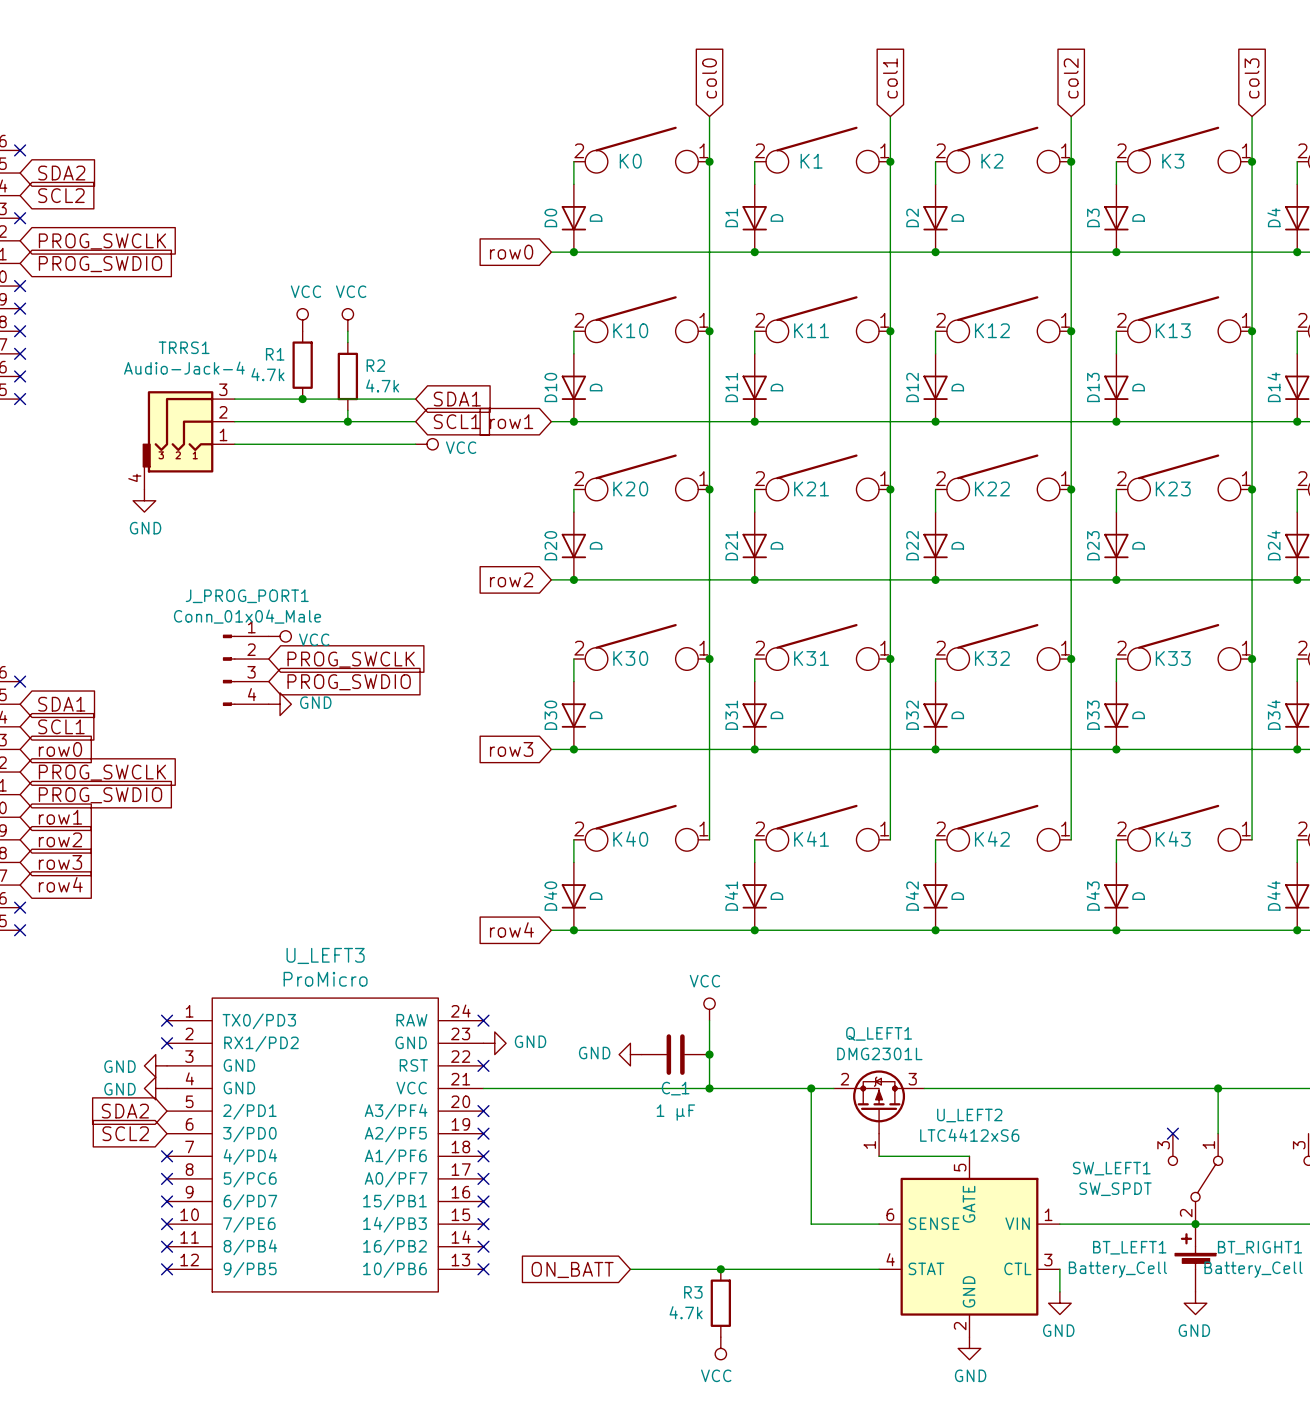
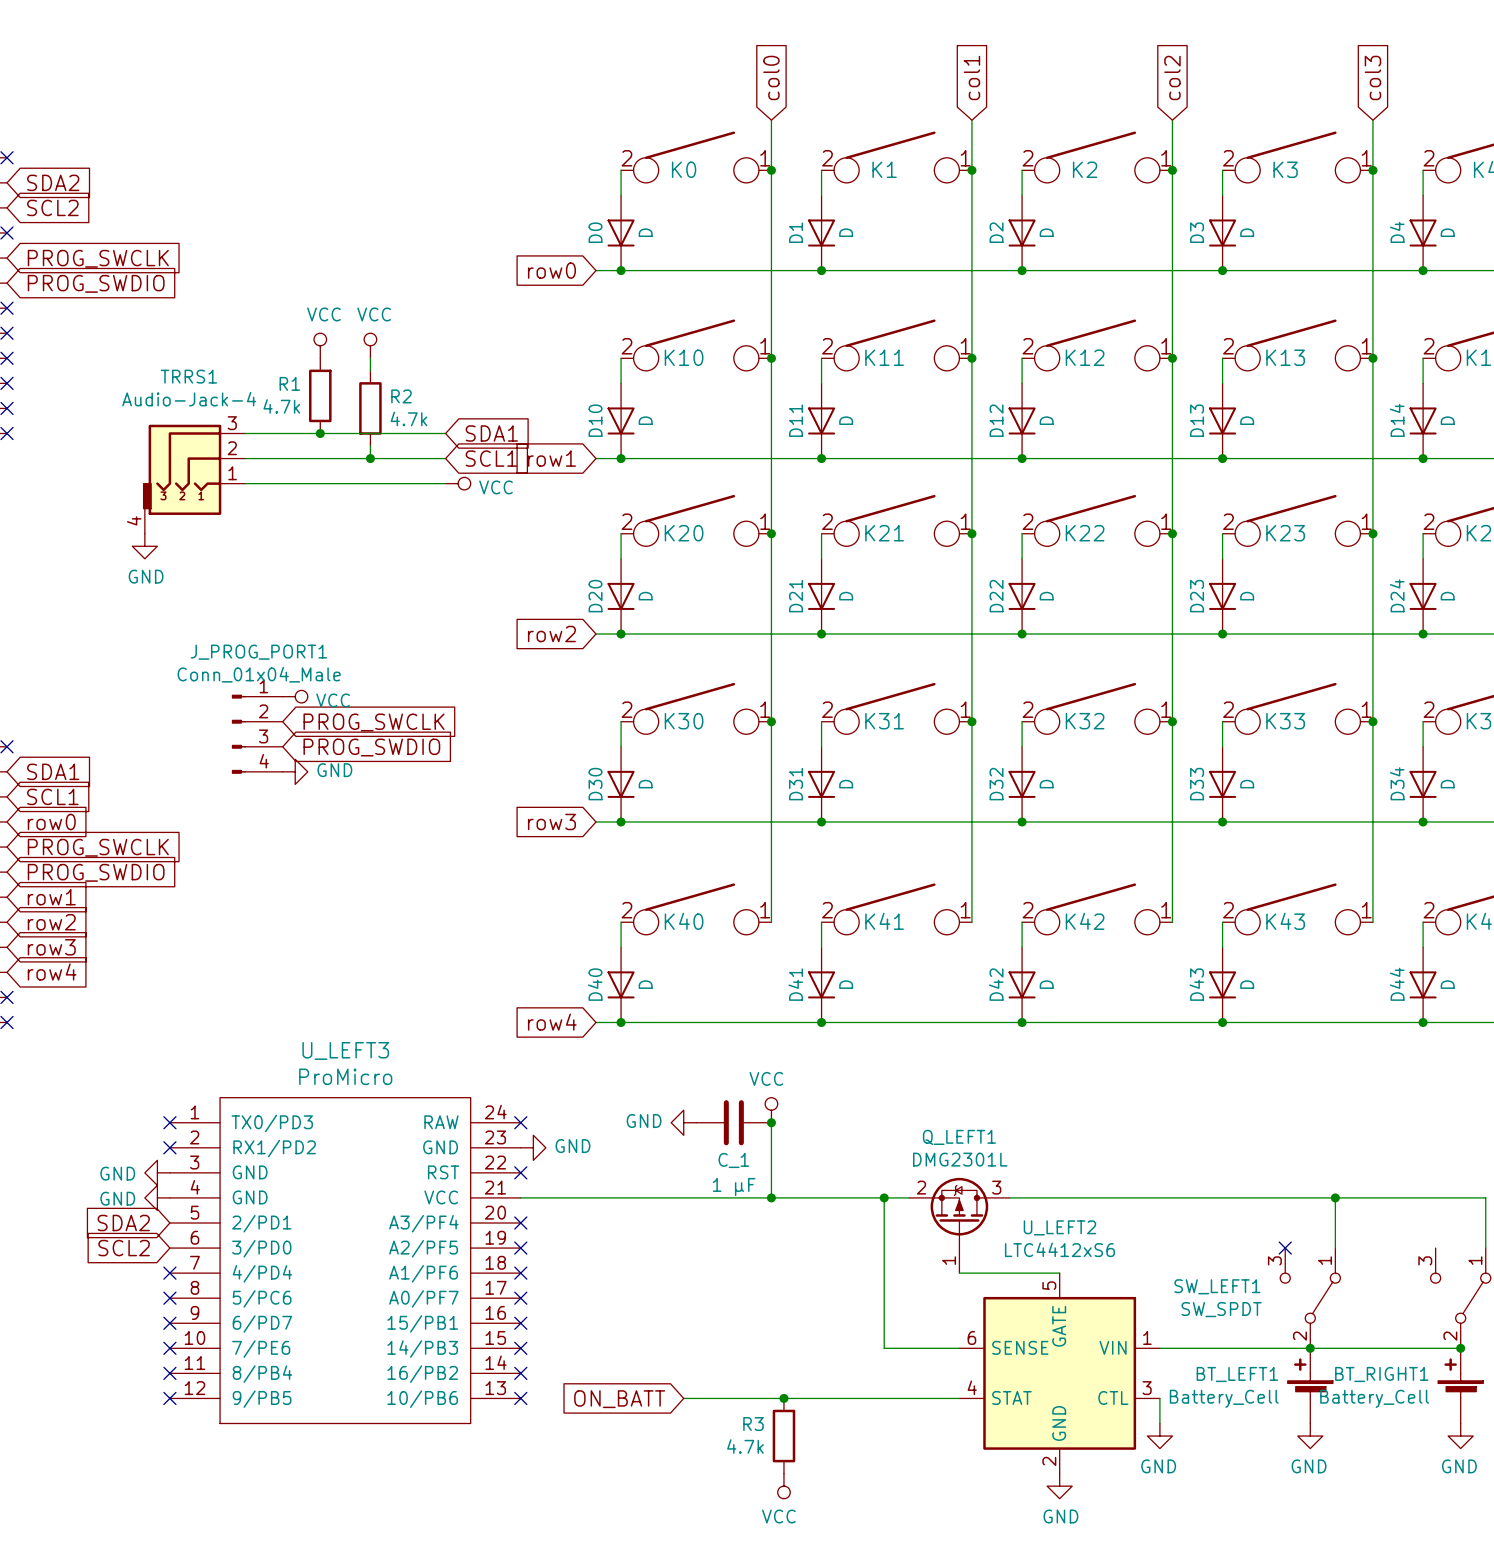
power symbol position: GND (630, 1054) -> GND (683, 1122)
C_1 position: (675, 1054) -> (733, 1122)
junction position: (709, 1054) -> (771, 1122)

